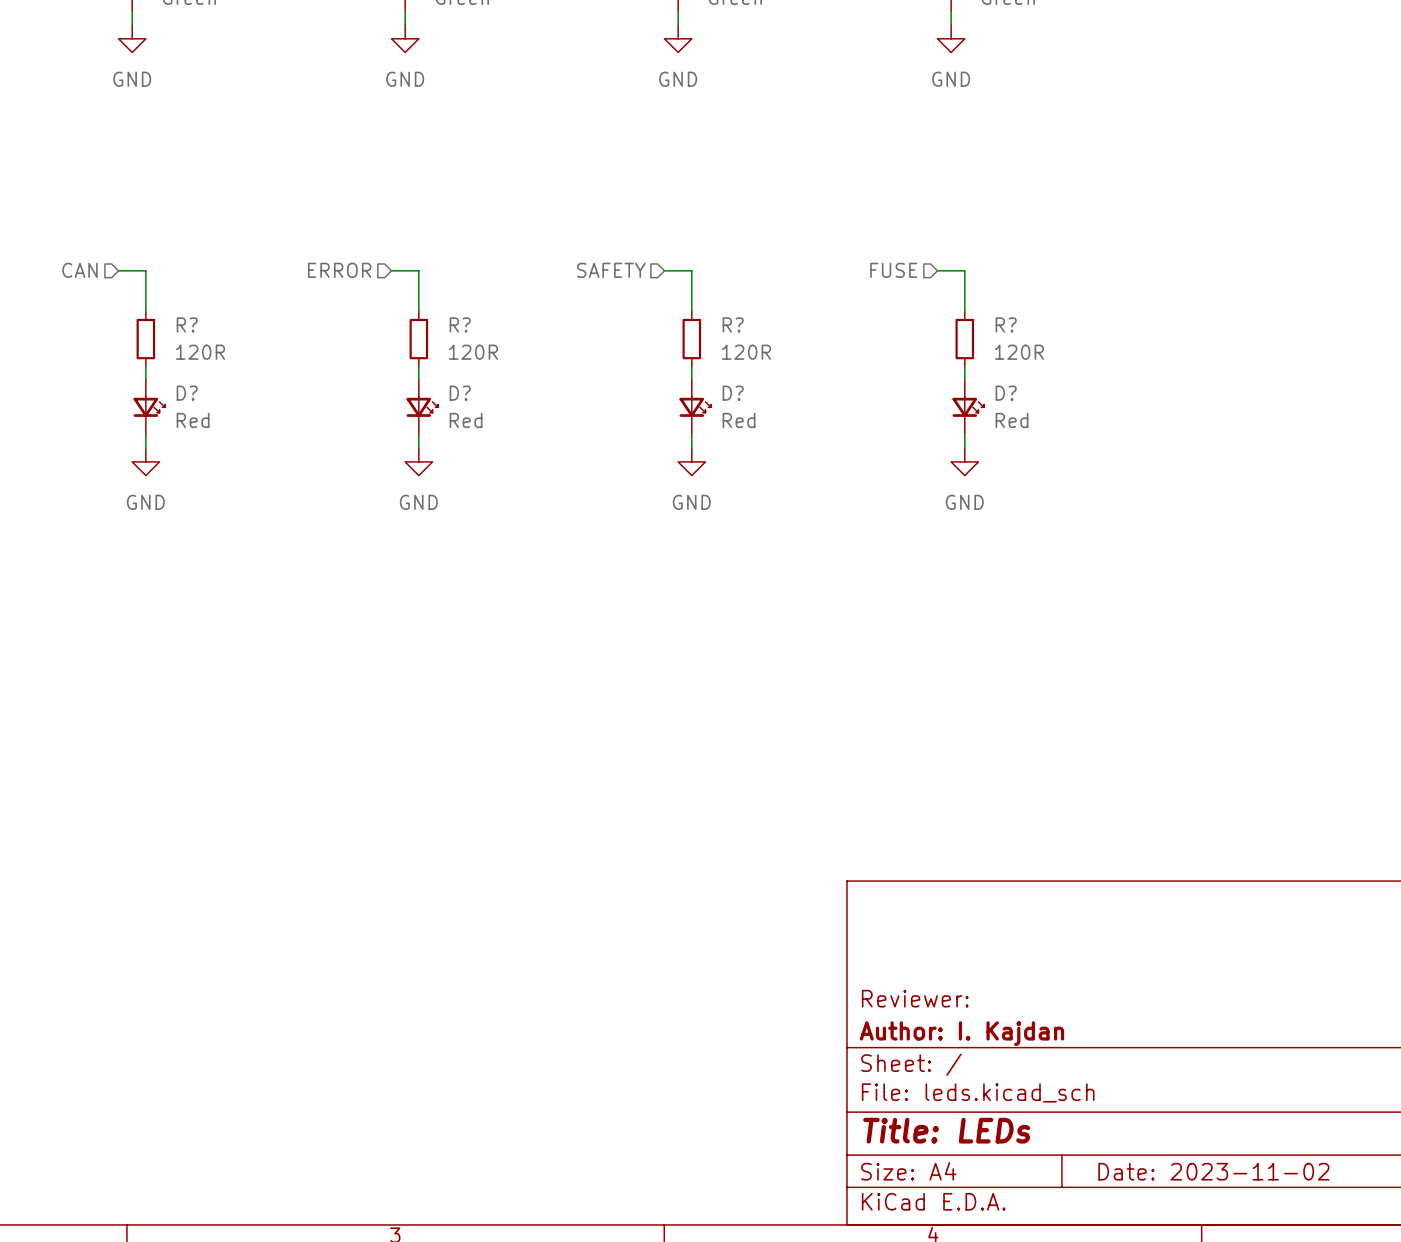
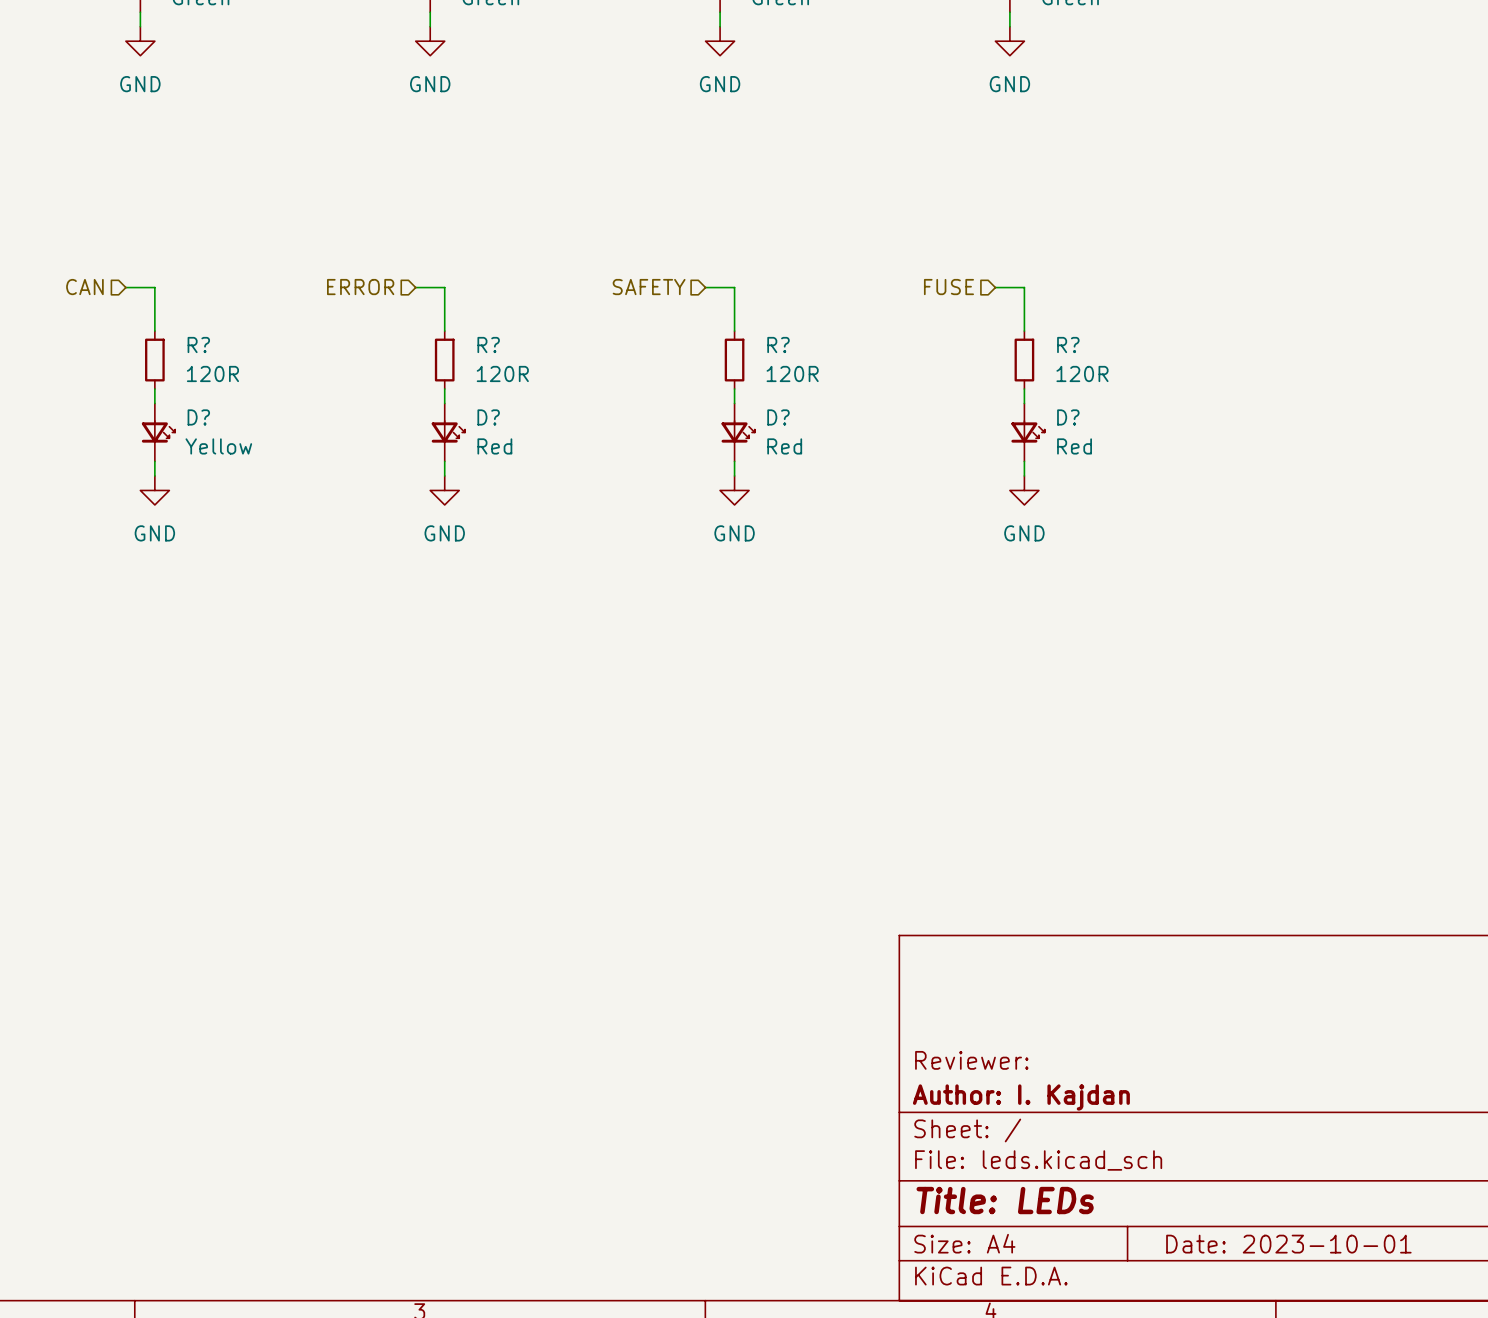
D? value: Red (193, 420) -> Yellow (218, 446)
title block: Date: 2023-11-02 (1213, 1171) -> Date: 2023-10-01 (1288, 1244)

